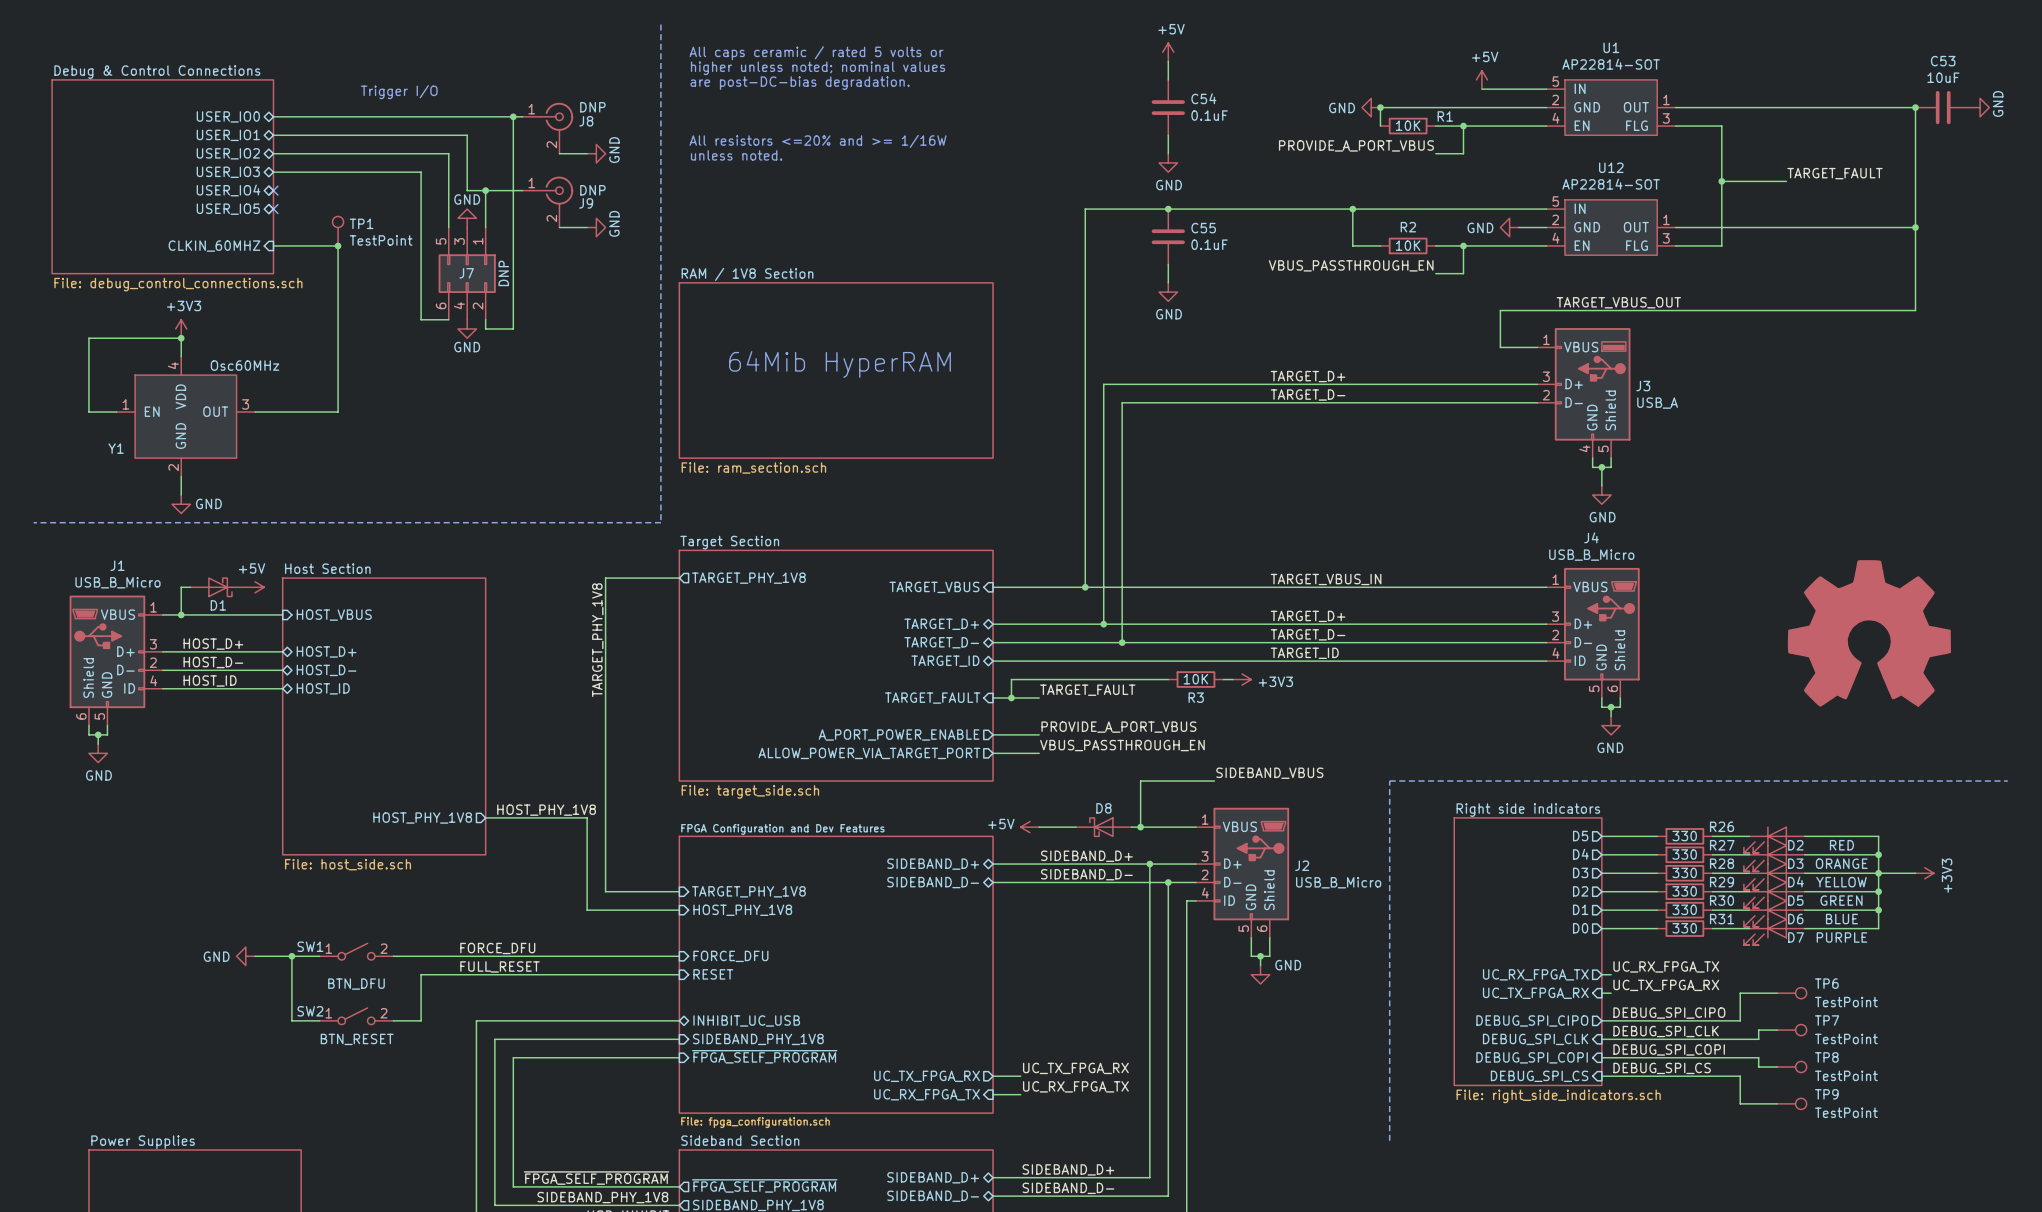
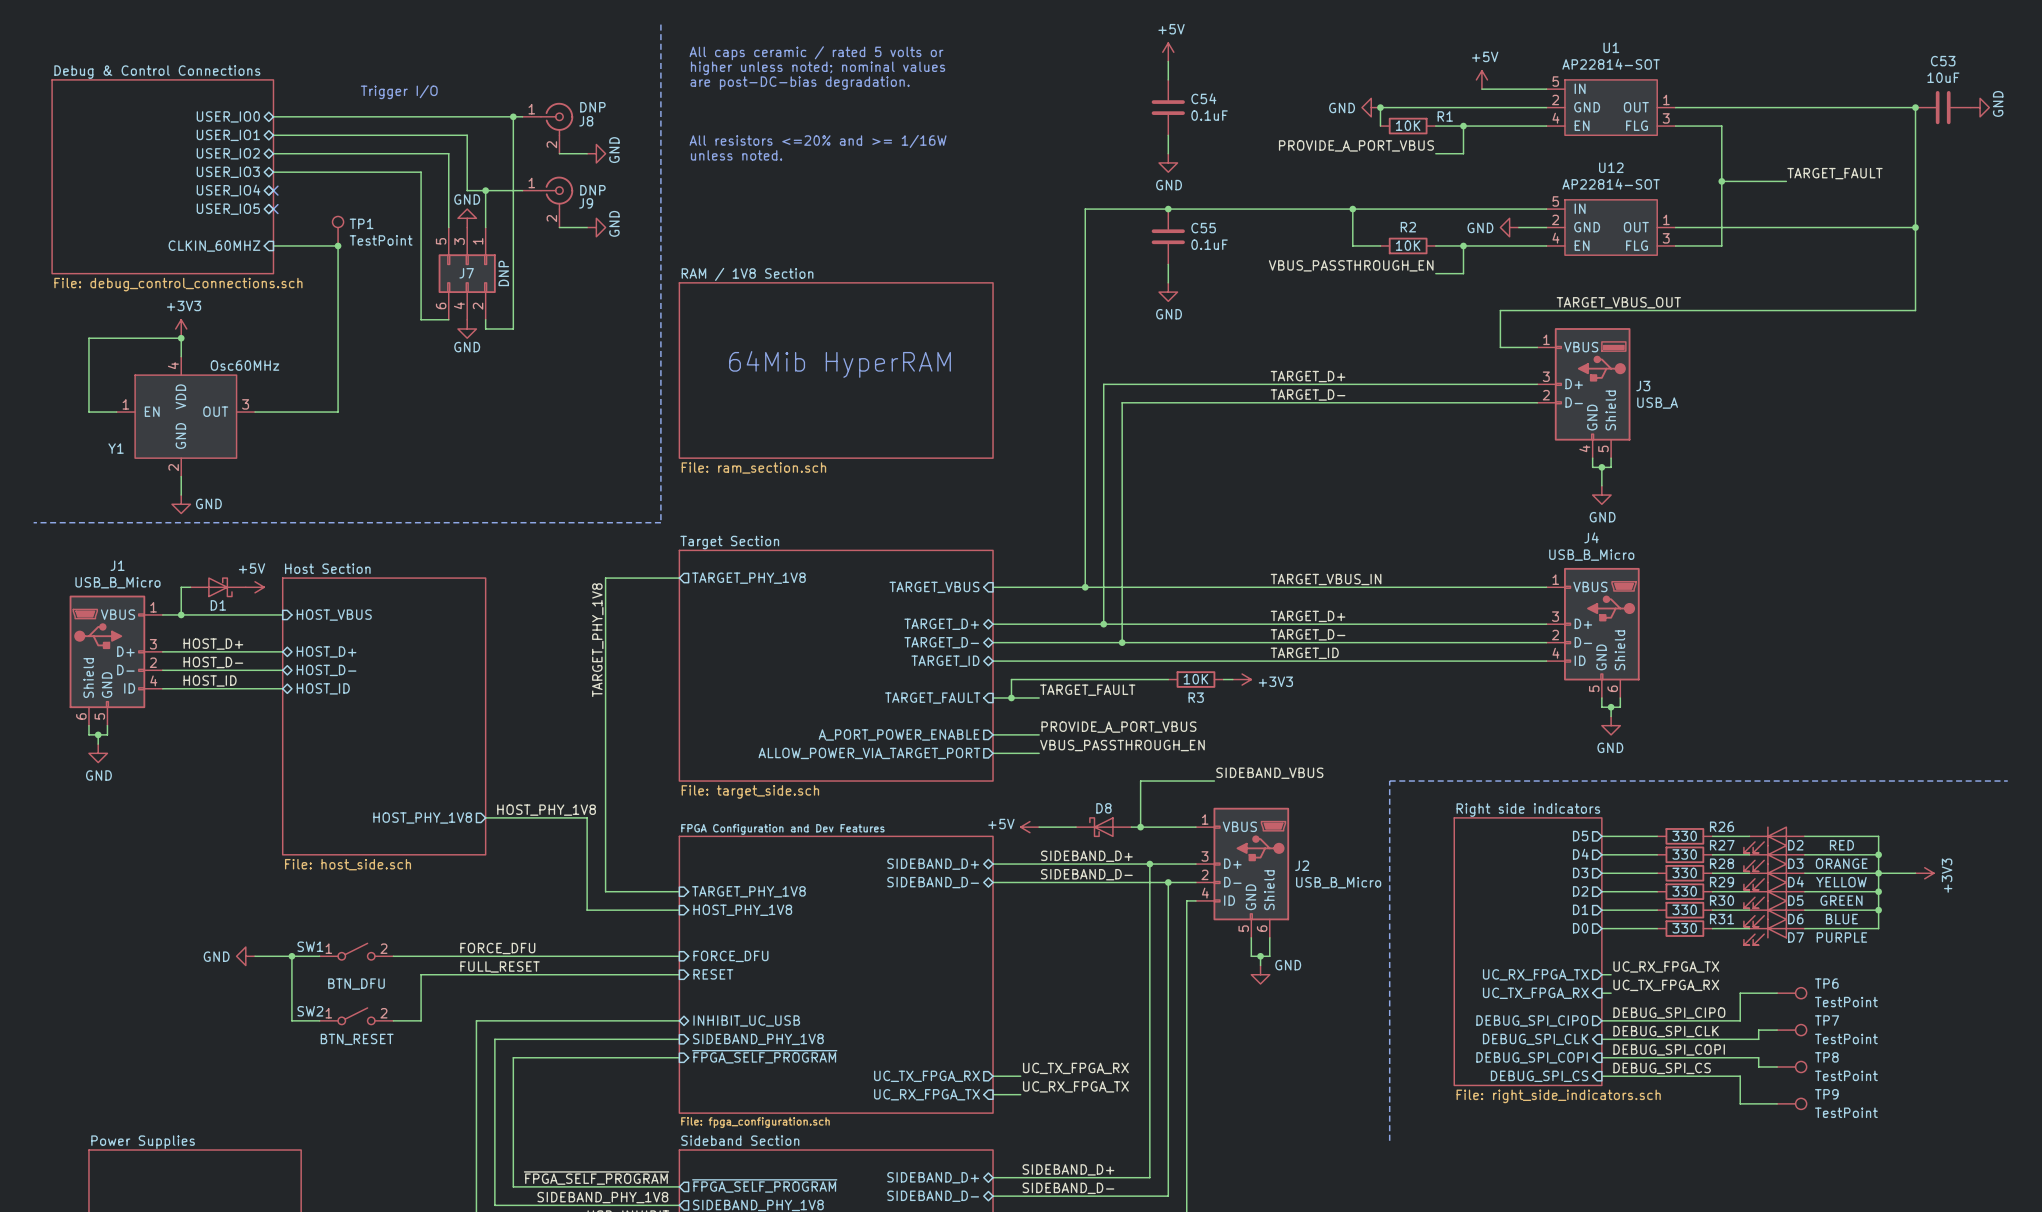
power symbol: (1869, 633) -> none

